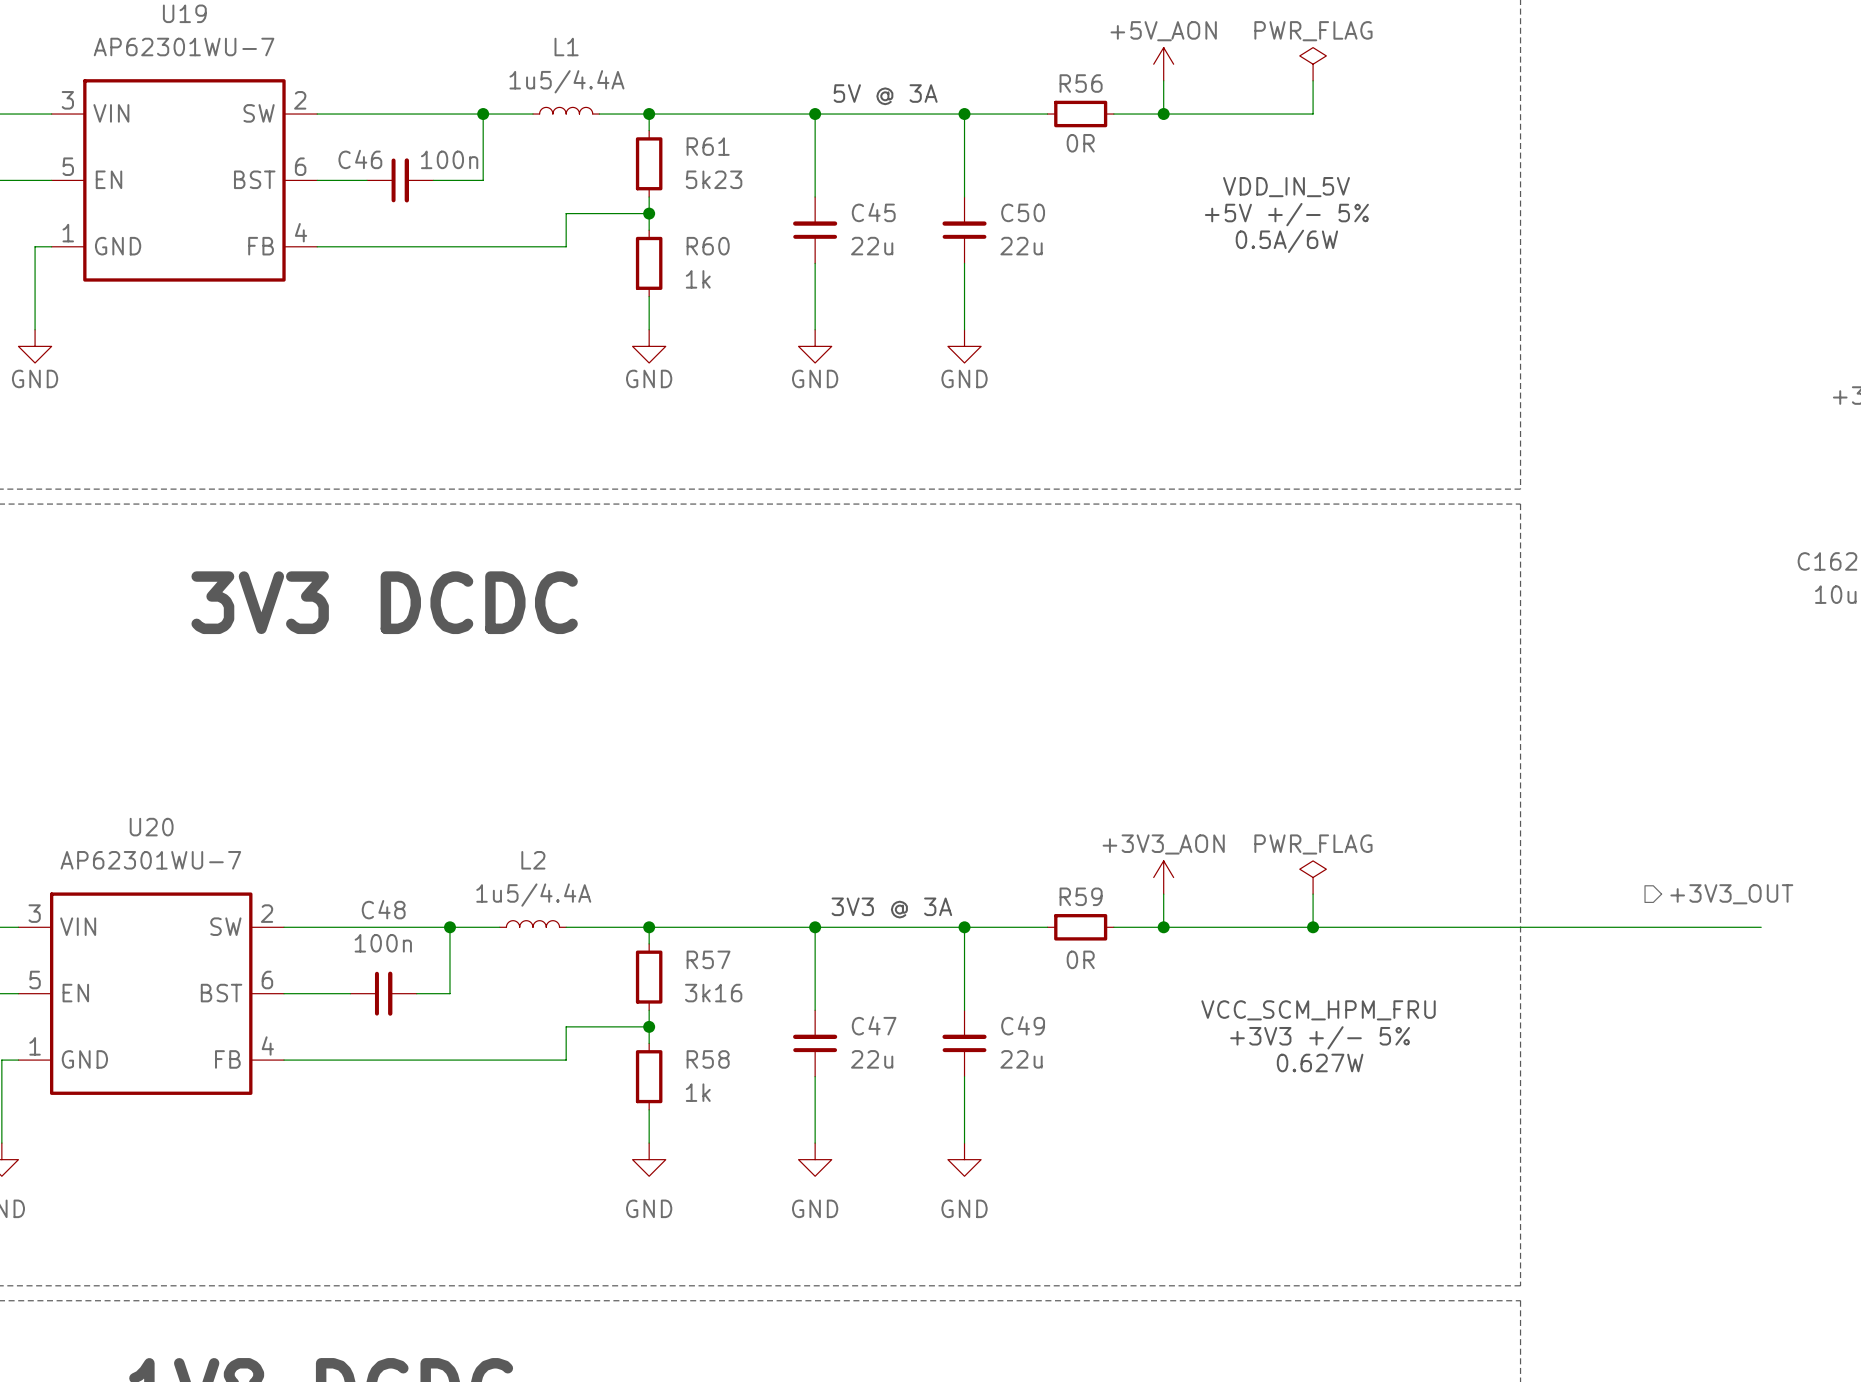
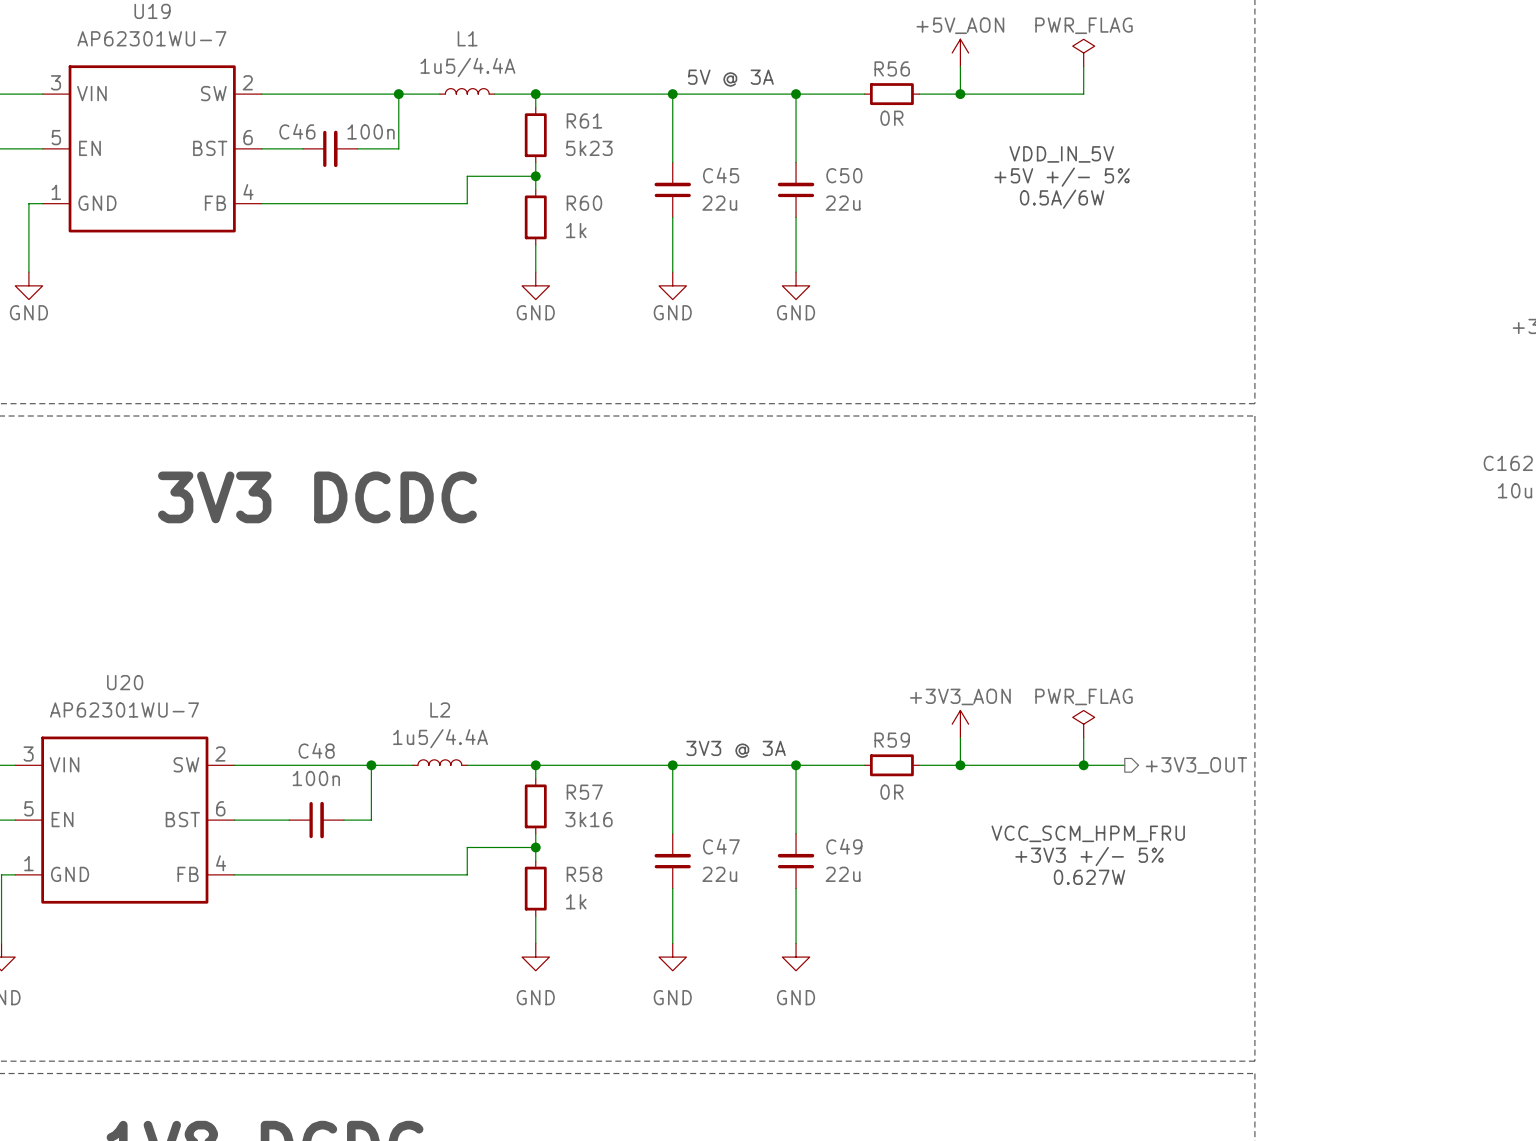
hierarchical label position: +3V3_OUT (1731, 894) -> +3V3_OUT (1196, 765)
wire: (1362, 927) (1761, 927) -> none

